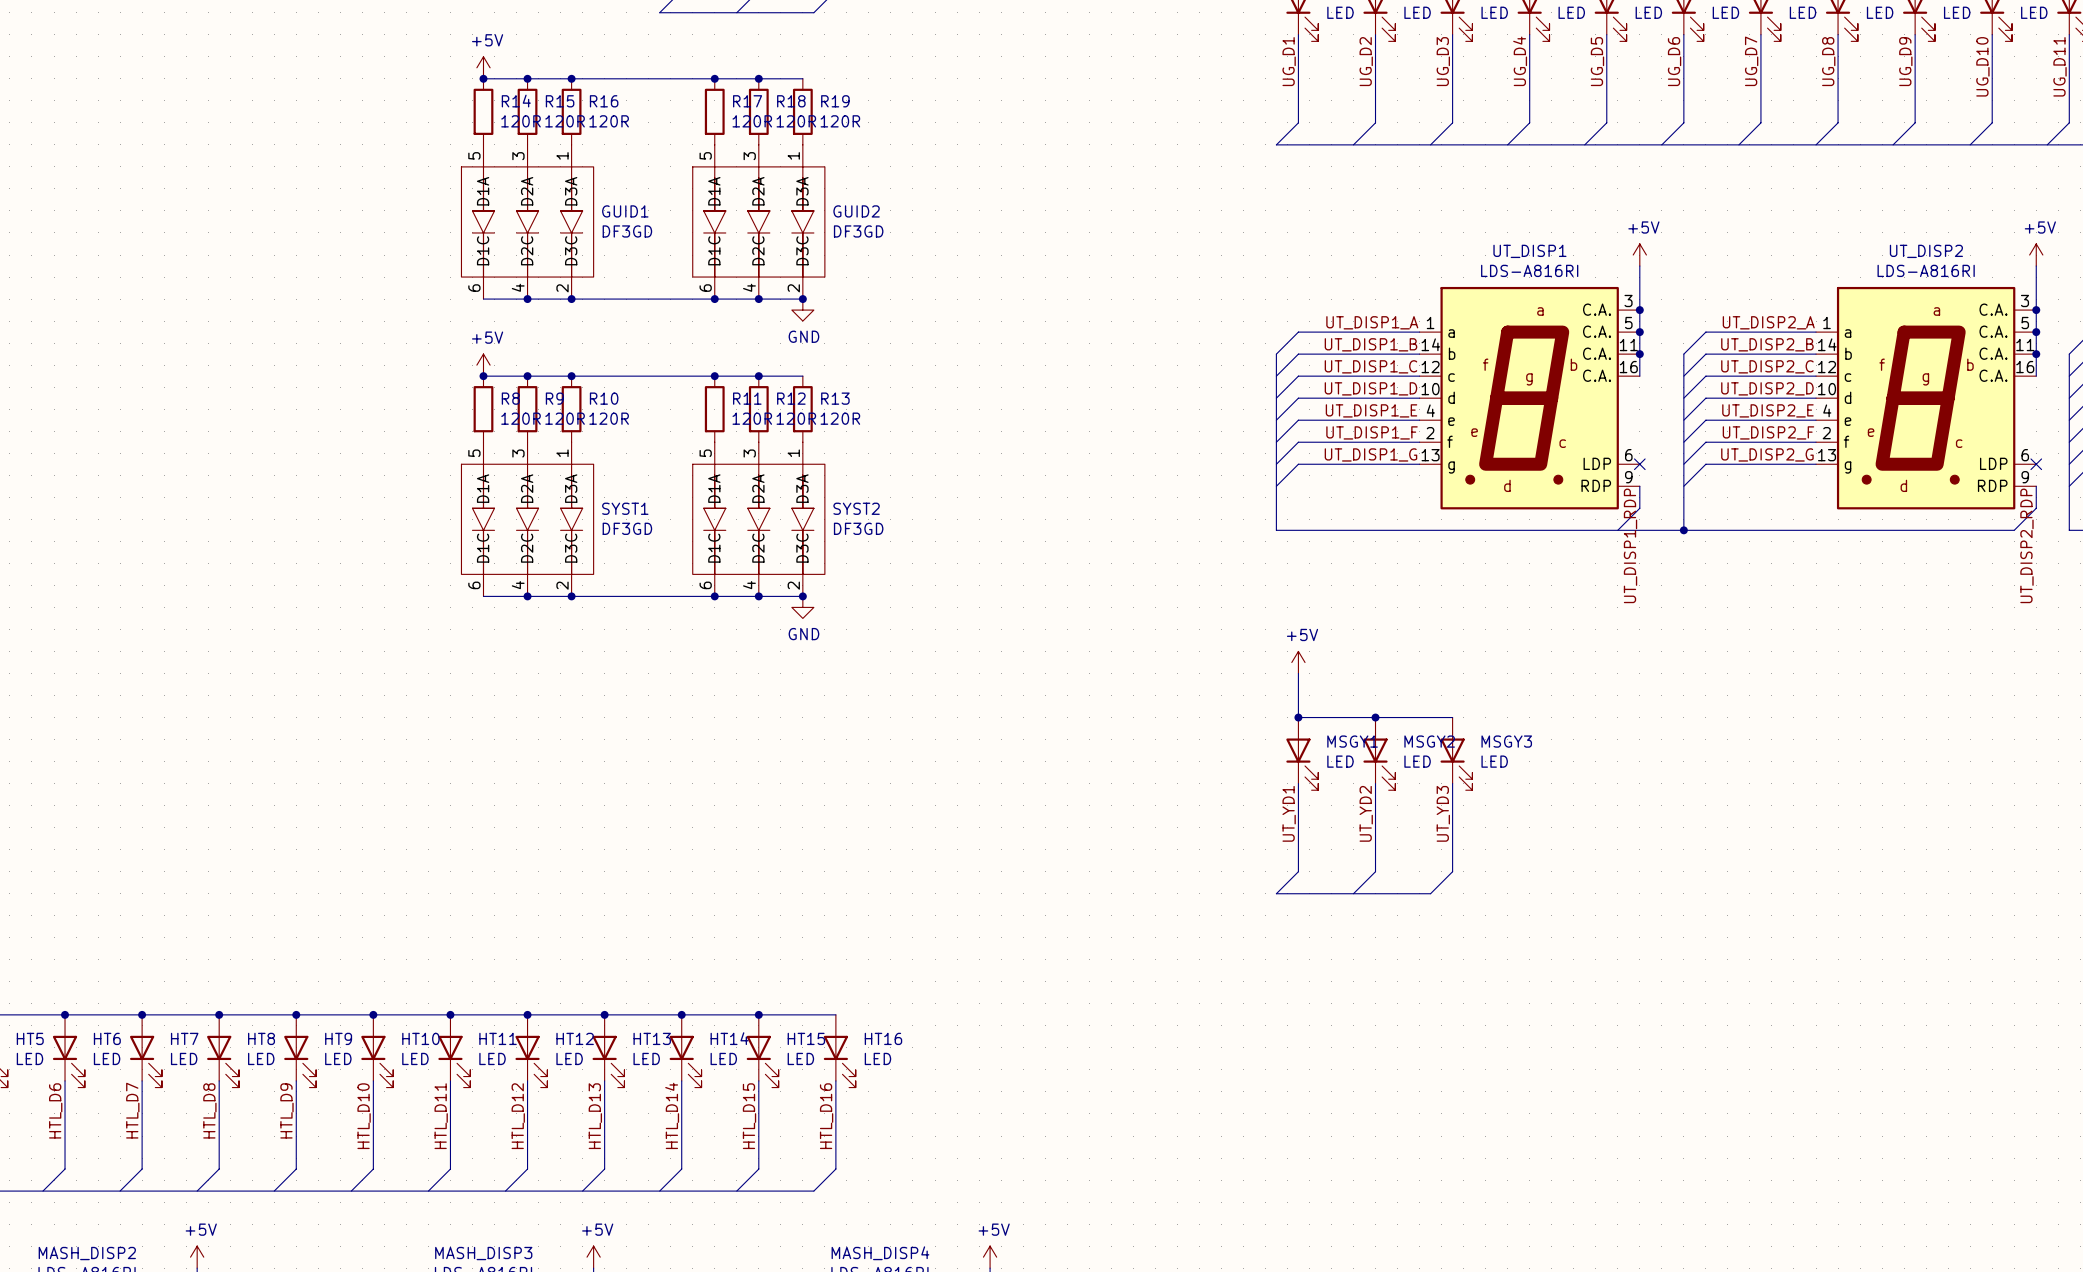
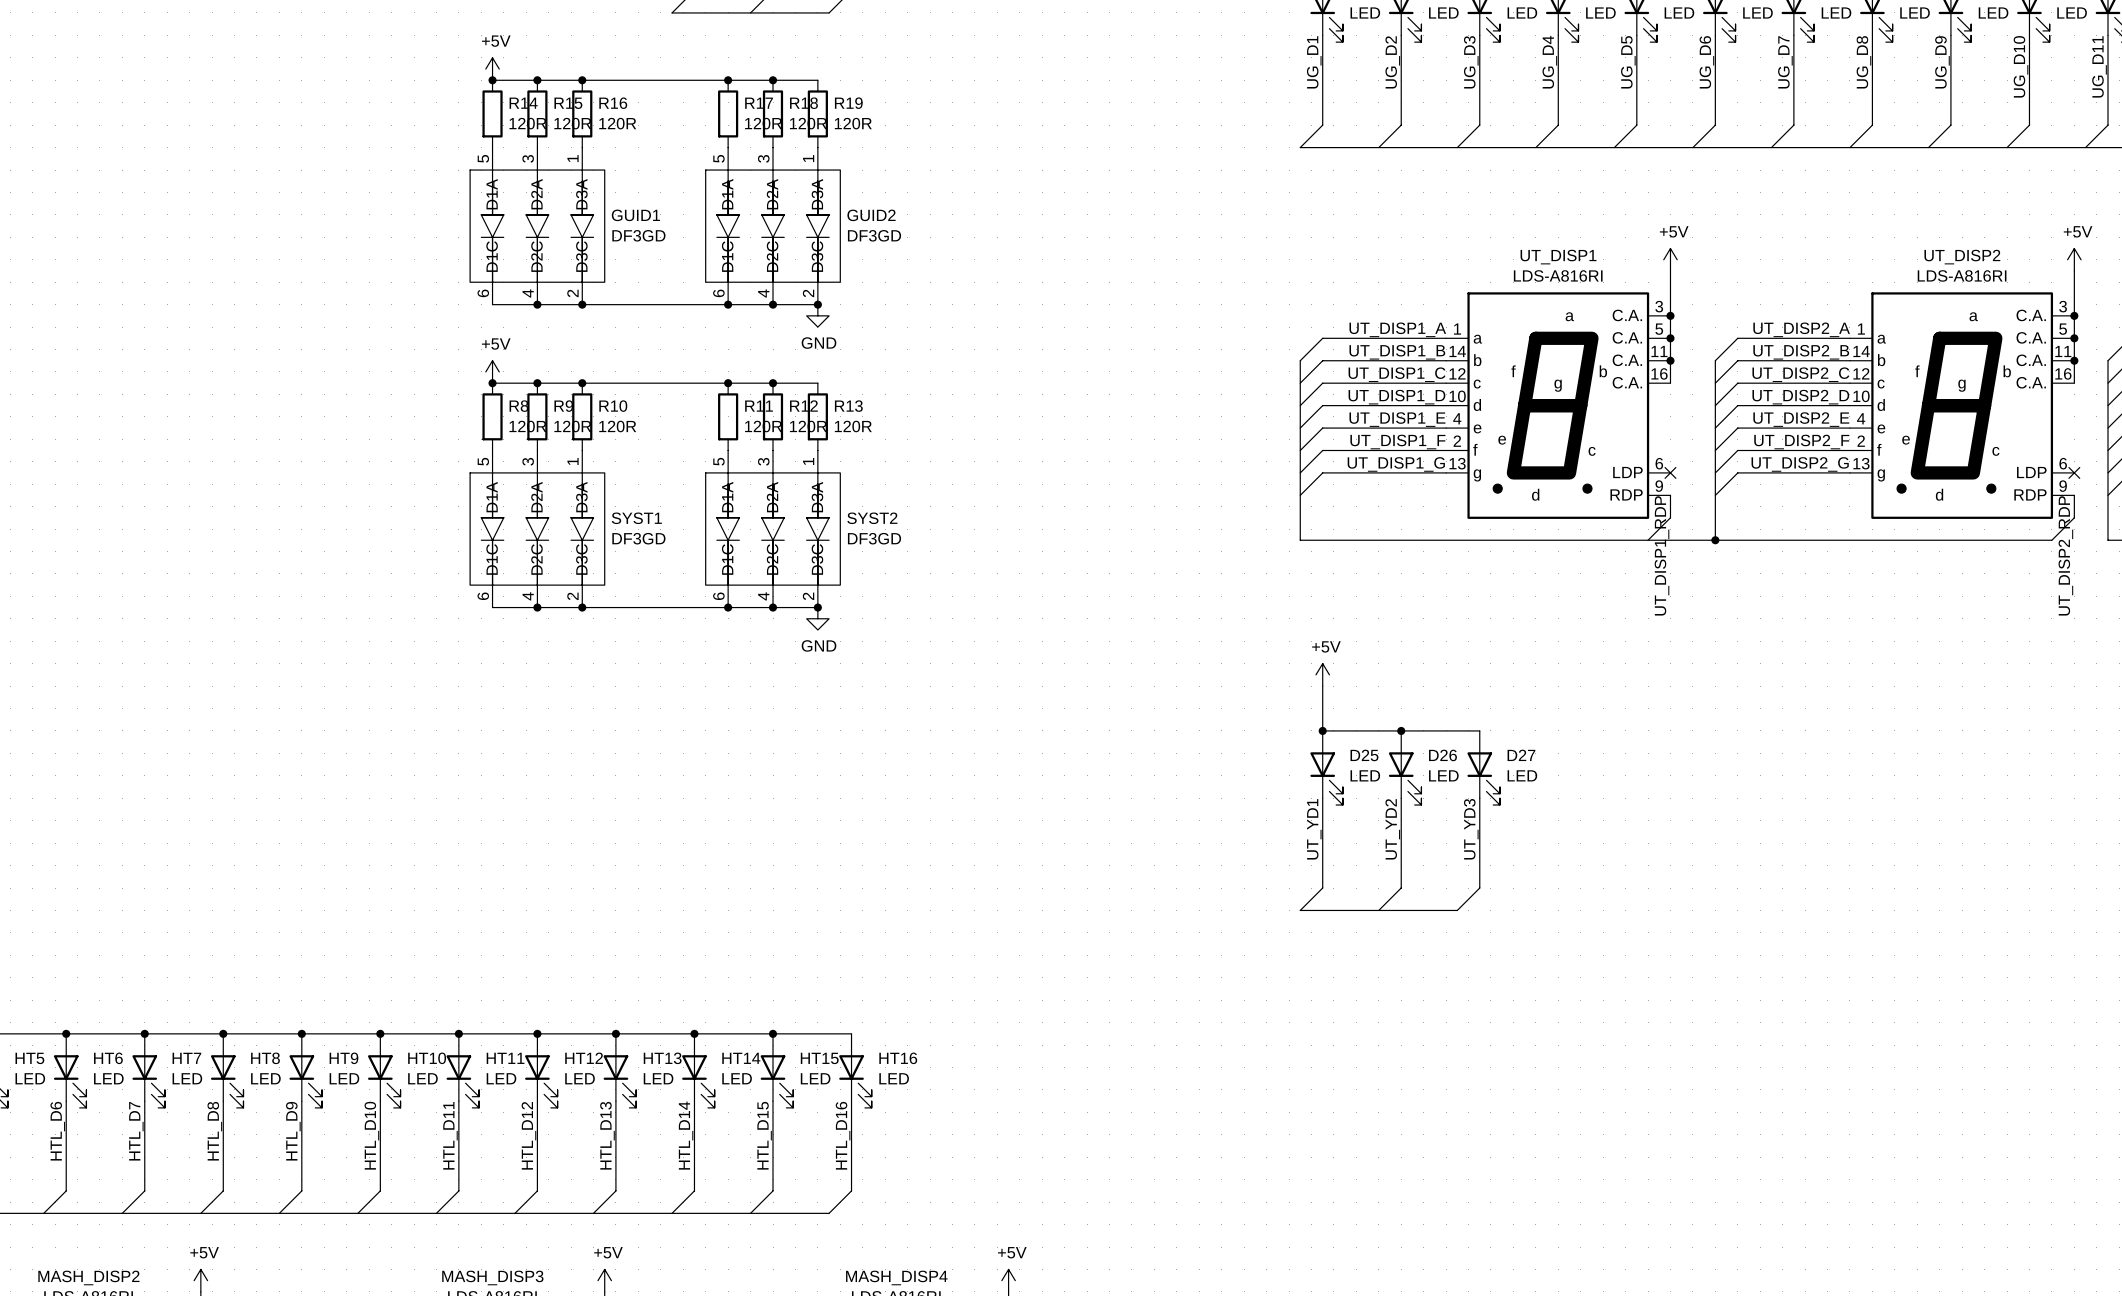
MSGY1 name: MSGY1 (1352, 741) -> D25 (1364, 755)
MSGY2 name: MSGY2 (1429, 741) -> D26 (1442, 755)
MSGY3 name: MSGY3 (1506, 741) -> D27 (1521, 755)

